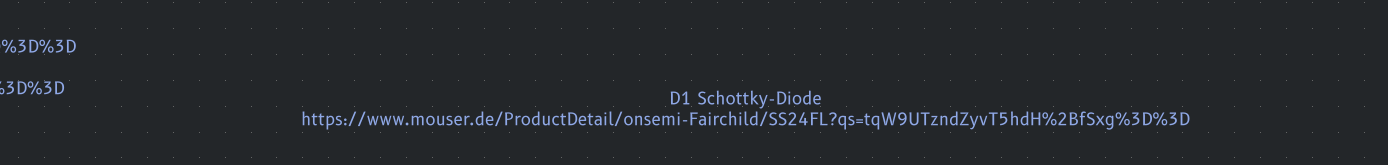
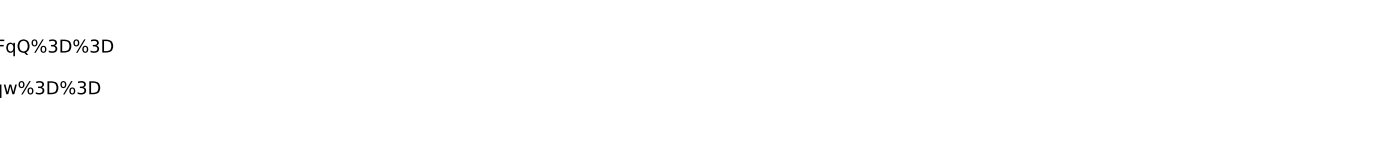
text: D1 Schottky-Diode (745, 99) -> none
text: https://www.mouser.de/ProductDetail/onsemi-Fairchild/SS24FL?qs=tqW9UTzndZyvT5hdH%2BfSxg%3D%3D (746, 120) -> none

